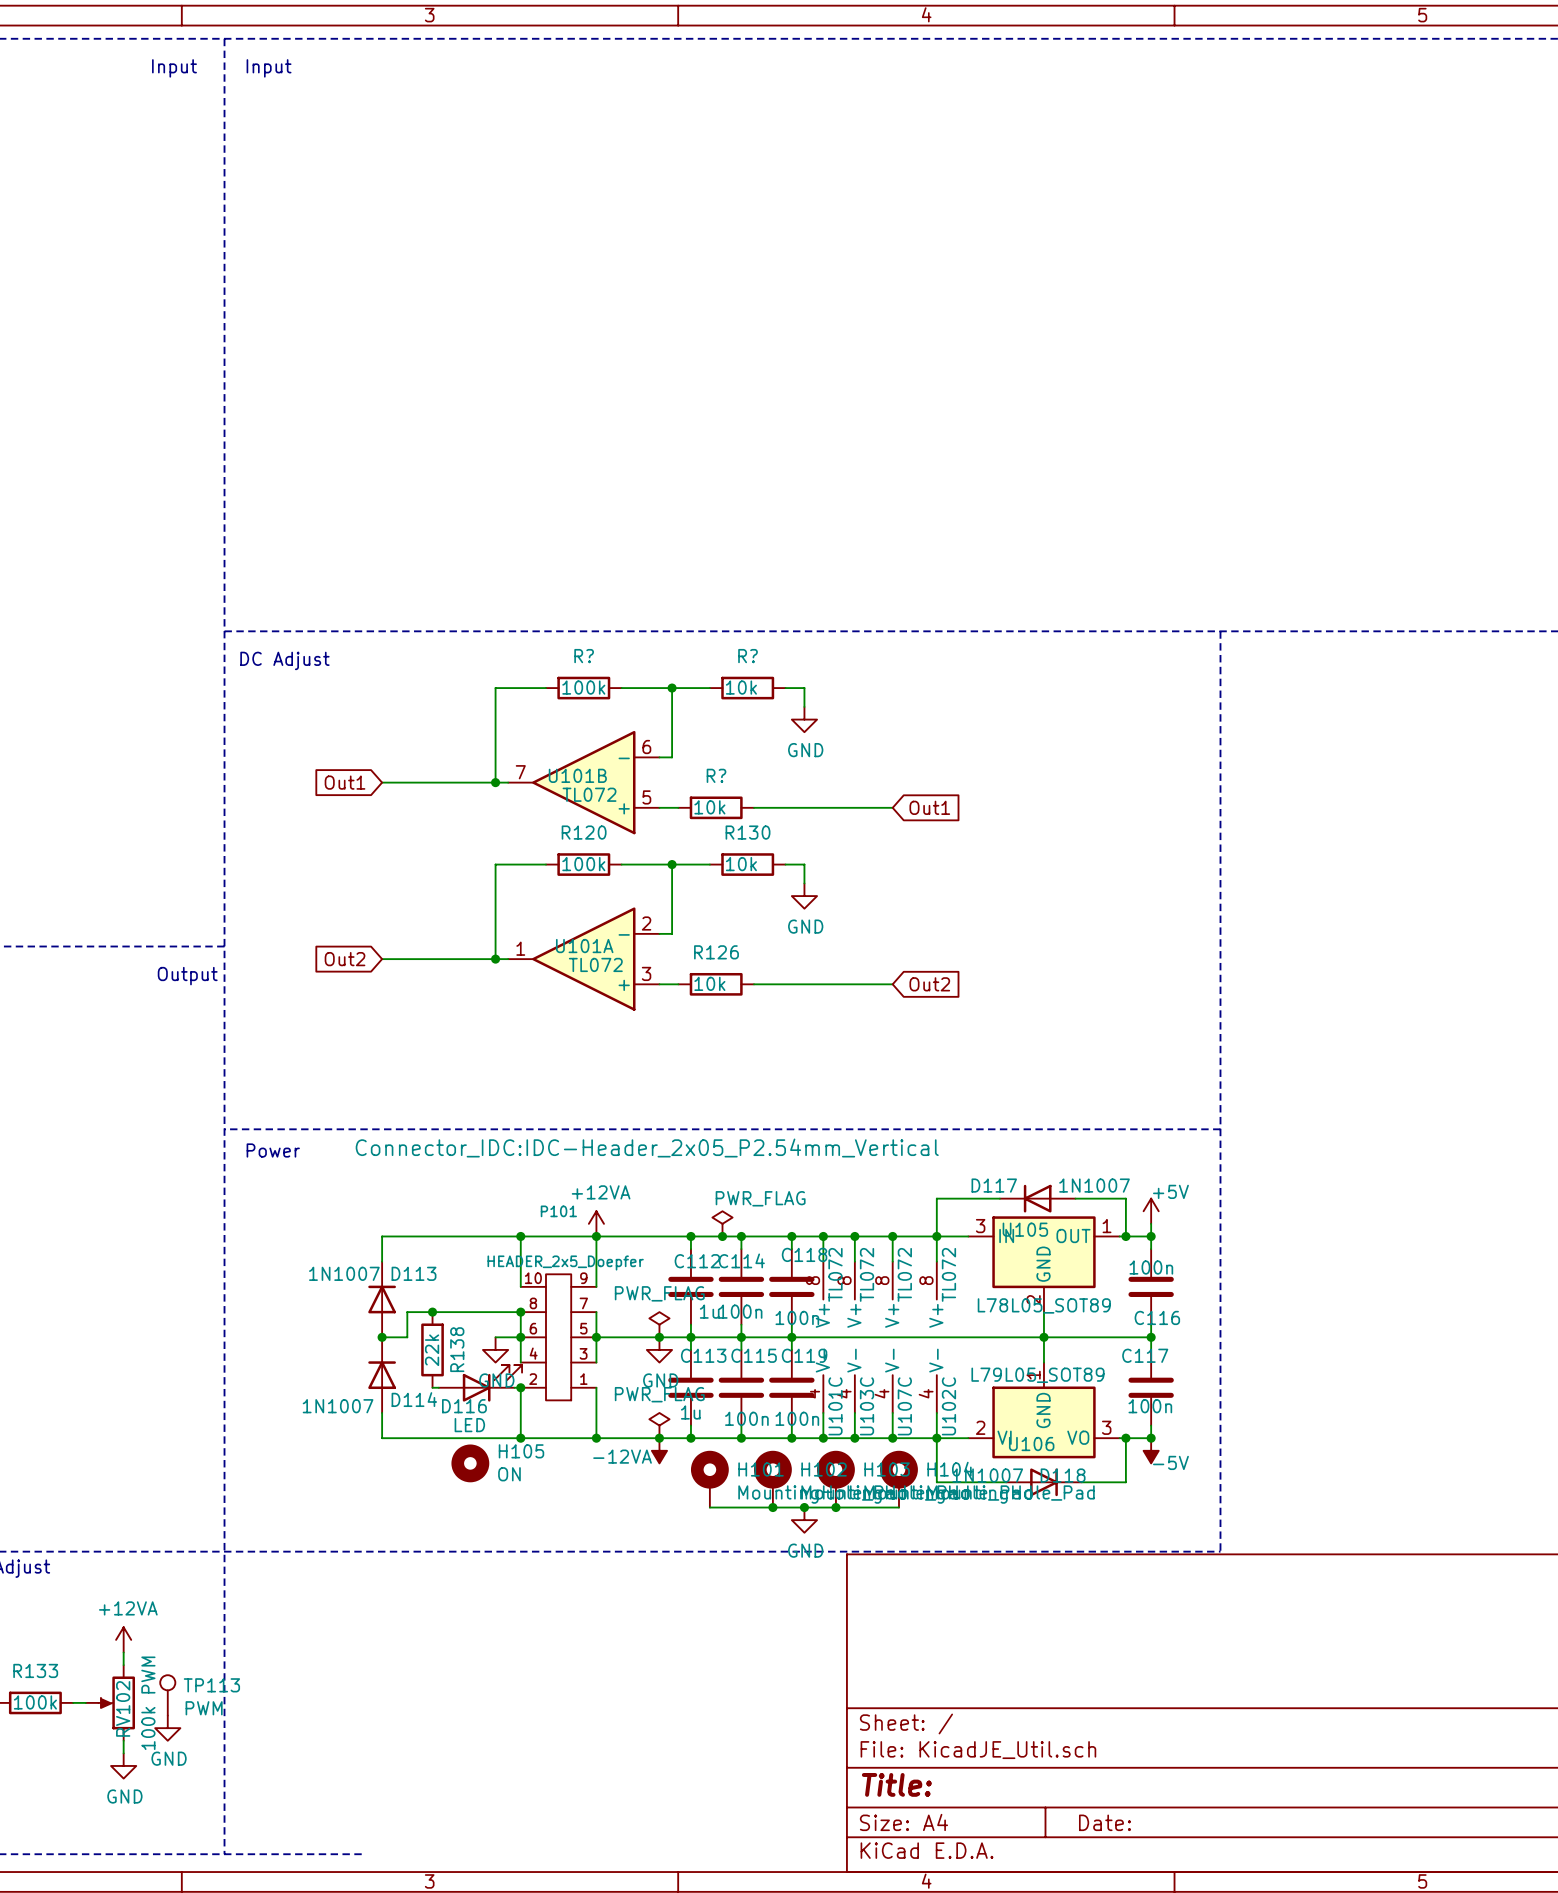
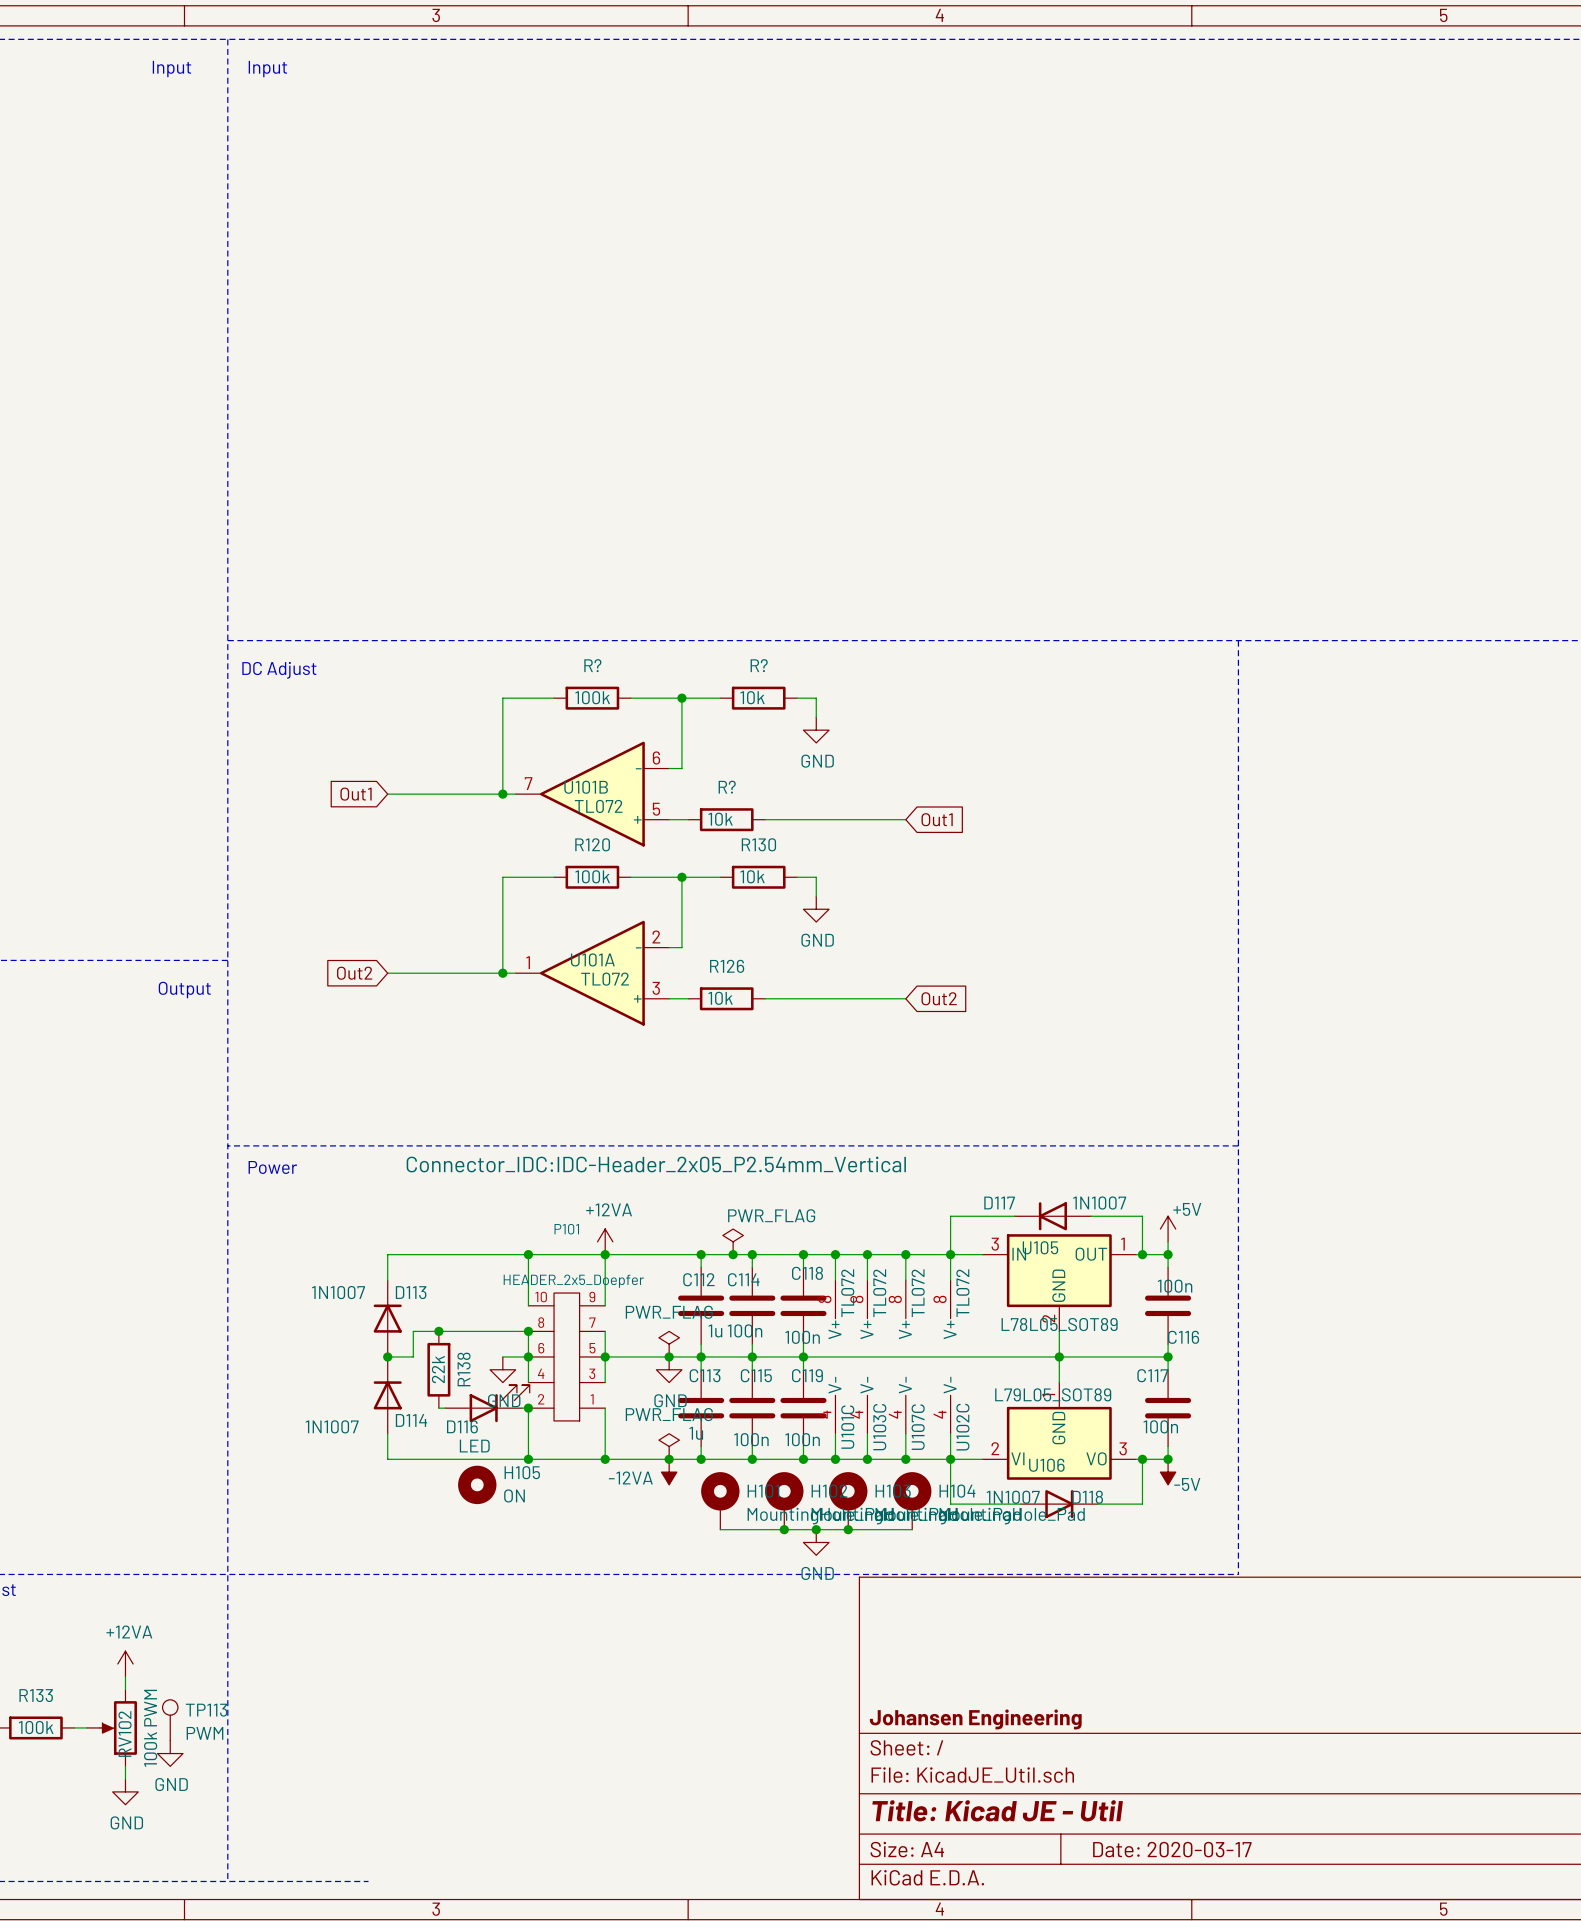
title block: none -> Johansen Engineering (975, 1719)
title block: Title: (896, 1784) -> Title: Kicad JE - Util (997, 1810)
title block: Date: (1104, 1822) -> Date: 2020-03-17 (1172, 1849)

